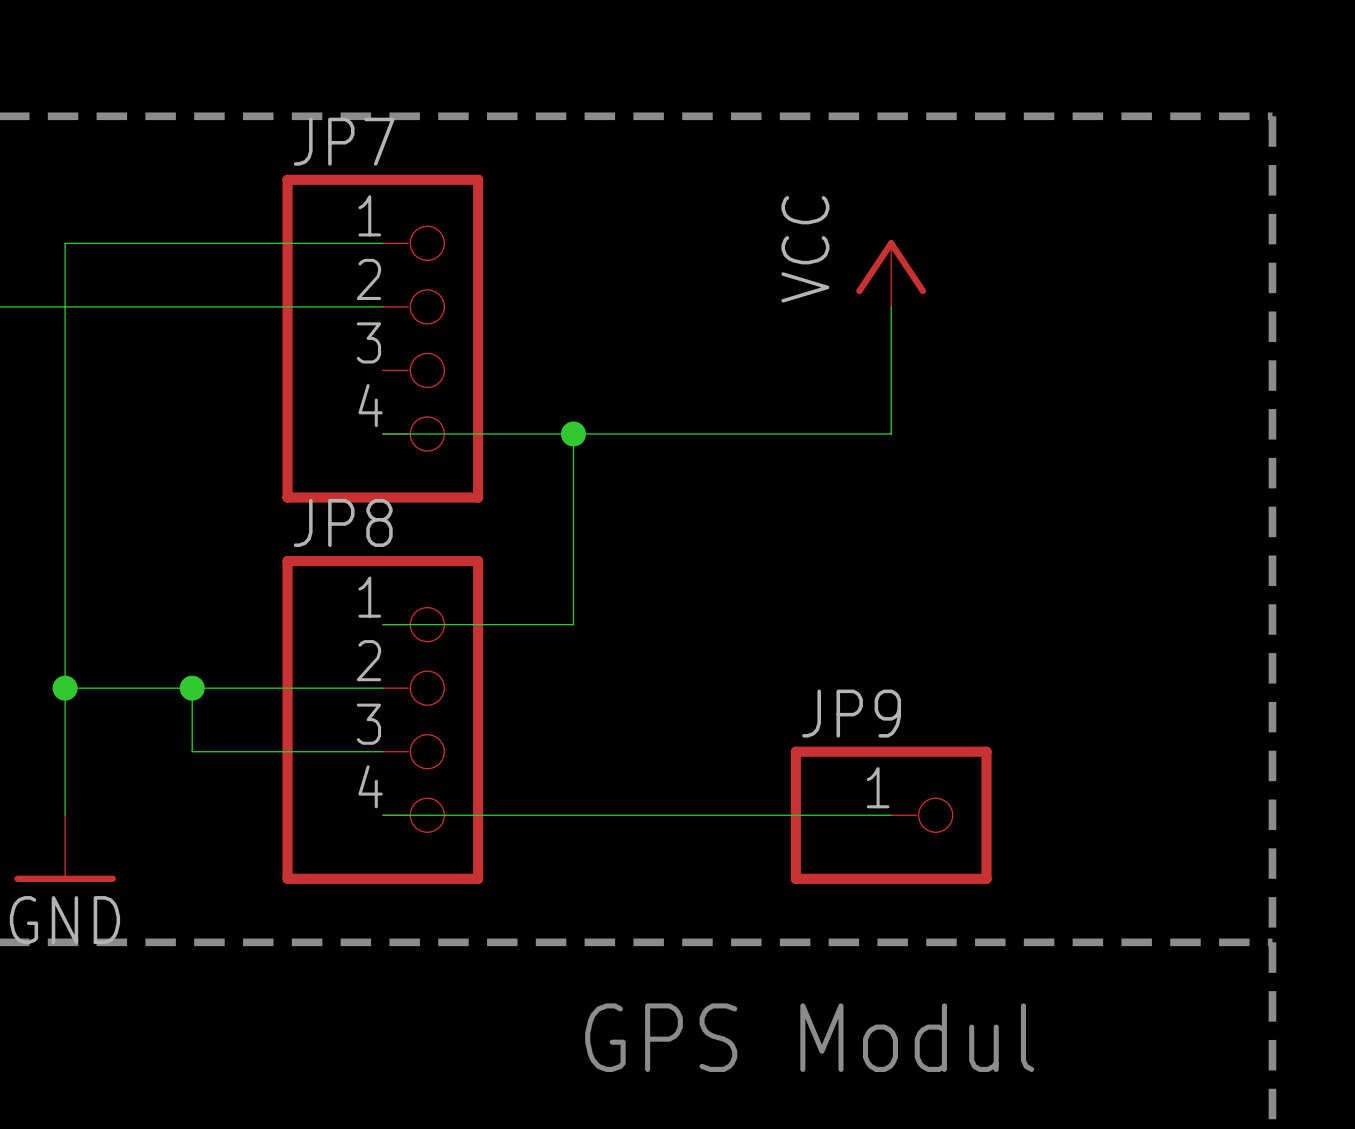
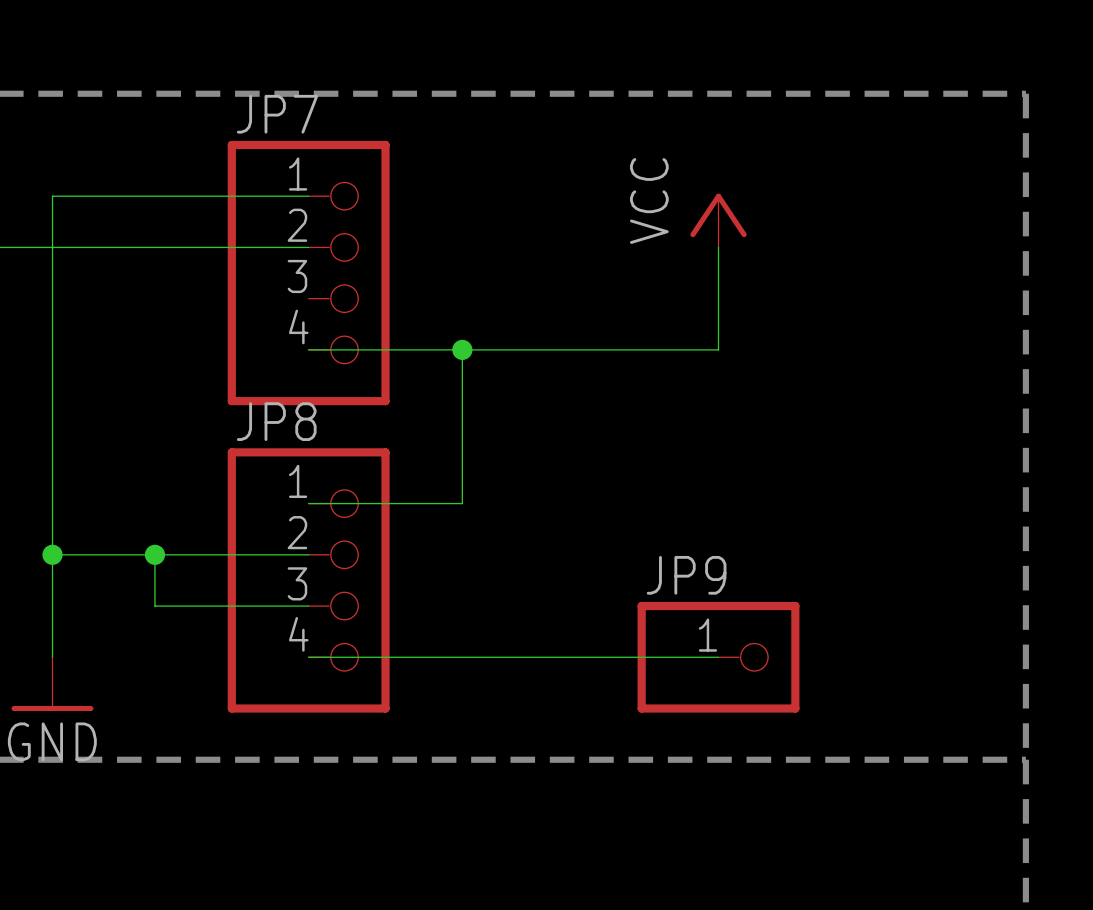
text: GPS Modul (809, 1037) -> none

